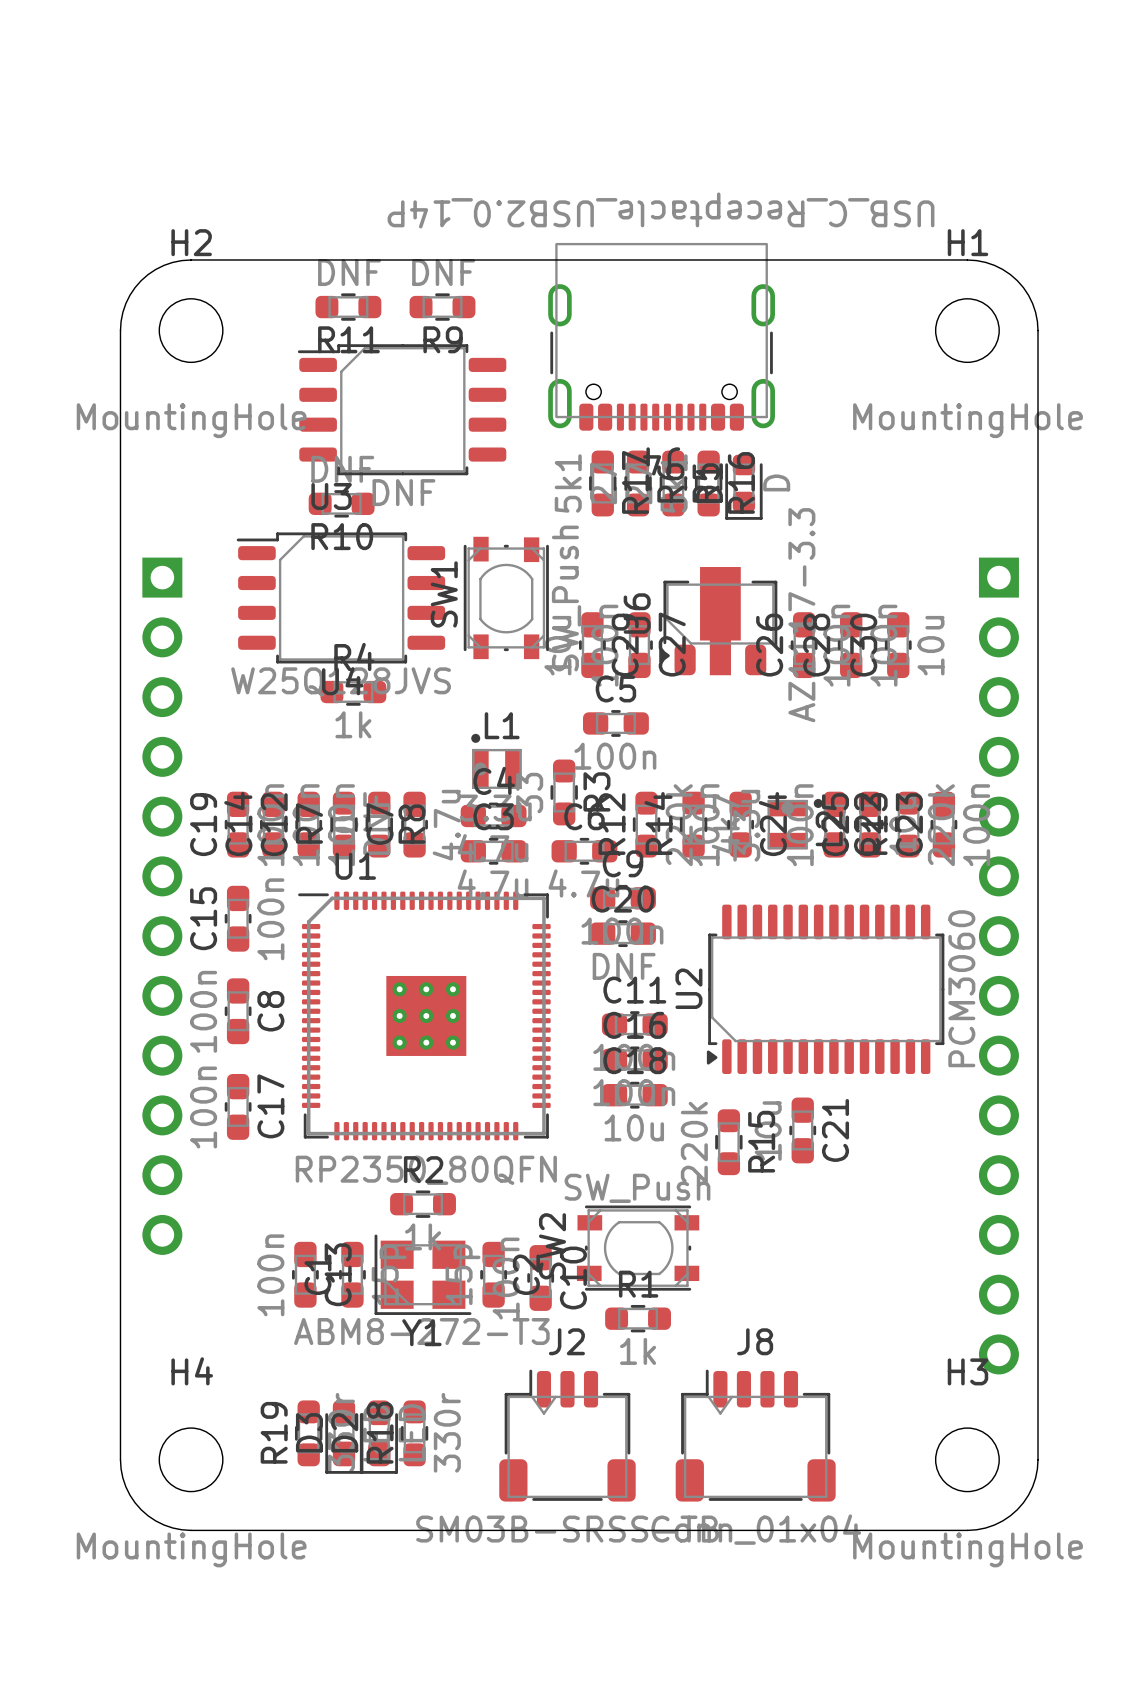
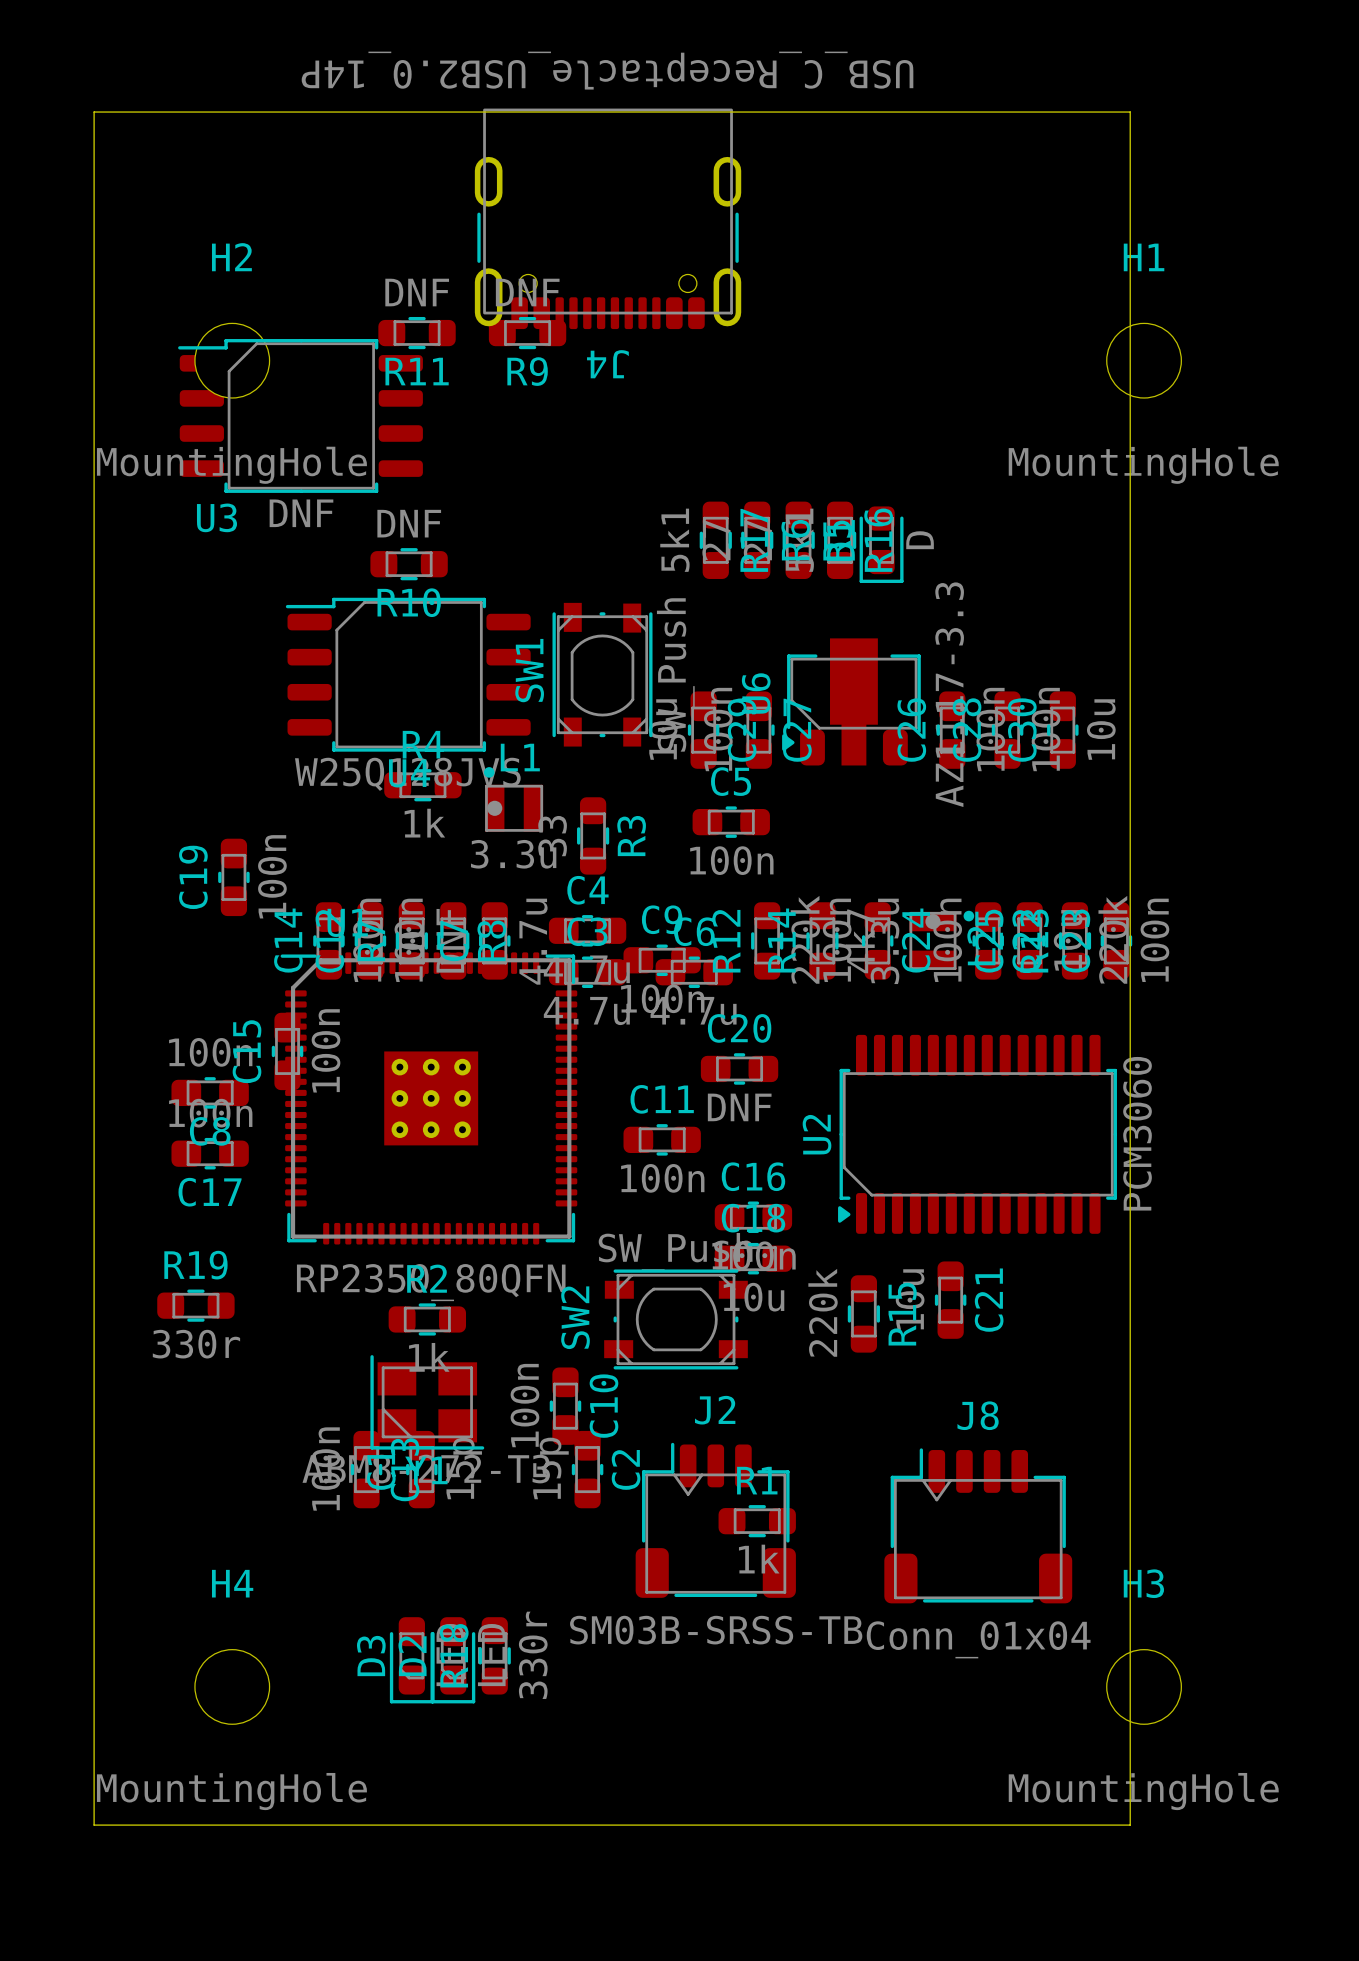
board edge: (191, 259) (967, 259) (985, 262) (1002, 269) (1017, 280) (1028, 295) (1035, 312) (1038, 330) (1038, 1459) (1035, 1478) (1028, 1495) (1017, 1509) (1002, 1520) (985, 1528) (967, 1530) (191, 1530) (172, 1528) (155, 1520) (141, 1509) (129, 1495) (122, 1478) (120, 1459) (120, 330) (125, 303) (141, 280) (164, 265) (191, 259) -> (94, 112) (94, 1825) (1130, 1825) (1130, 112) (94, 112)
J4 position: (661, 336) -> (608, 218)
U3 position: (402, 409) -> (300, 415)
L1 position: (496, 761) -> (513, 799)
R3 position: (564, 792) -> (593, 835)
C19 position: (238, 824) -> (233, 877)
C9 position: (623, 898) -> (662, 960)
part: (162, 906) -> none
part: (998, 966) -> none
C8 rotation: 0° (238, 1011) -> 90° clockwise (210, 1092)
C8 position: (238, 1011) -> (210, 1092)
U1 position: (424, 1015) -> (428, 1098)
C11 position: (634, 1024) -> (662, 1139)
C17 rotation: 0° (238, 1106) -> 90° clockwise (210, 1153)
C17 position: (238, 1106) -> (210, 1153)
R2 position: (423, 1204) -> (427, 1319)
SW2 position: (638, 1248) -> (676, 1319)
Y1 position: (423, 1274) -> (427, 1402)
C10 position: (540, 1277) -> (565, 1406)
R19 rotation: 0° (308, 1433) -> 90° clockwise (195, 1305)
R19 position: (308, 1433) -> (195, 1305)
J2 position: (567, 1435) -> (715, 1520)
J8 position: (755, 1435) -> (978, 1525)

